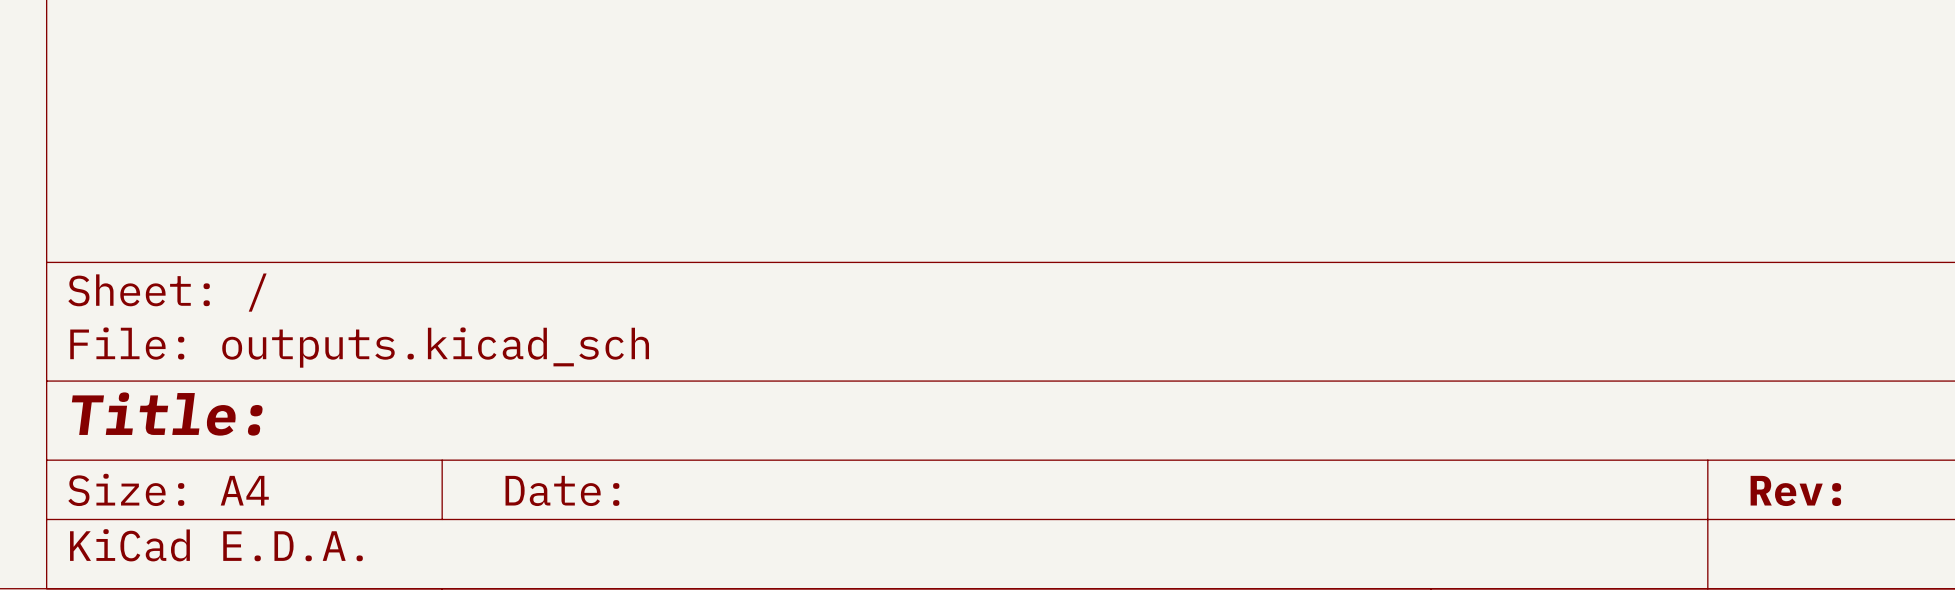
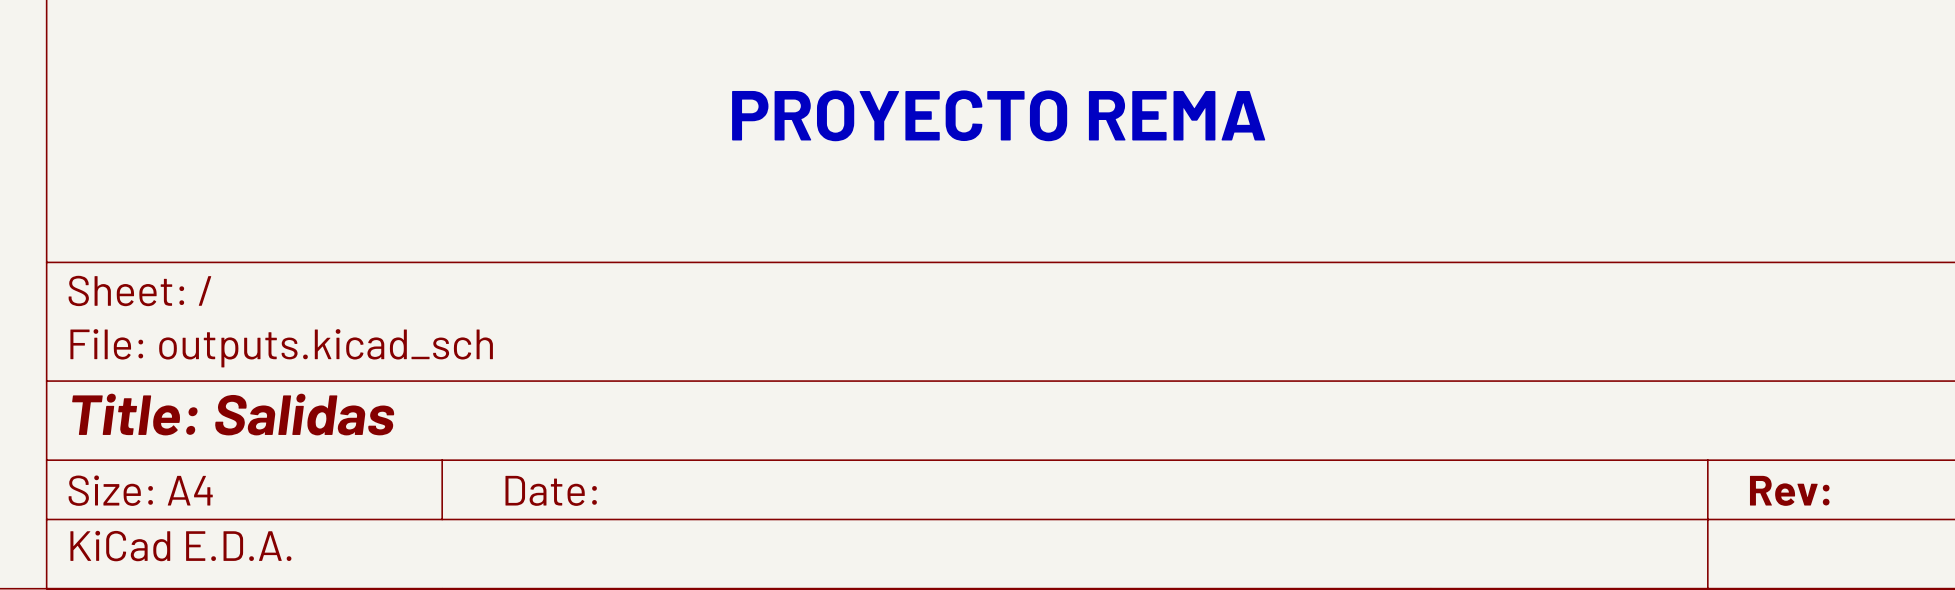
text: none -> PROYECTO REMA (998, 115)
title block: Title: (167, 414) -> Title: Salidas (233, 414)

